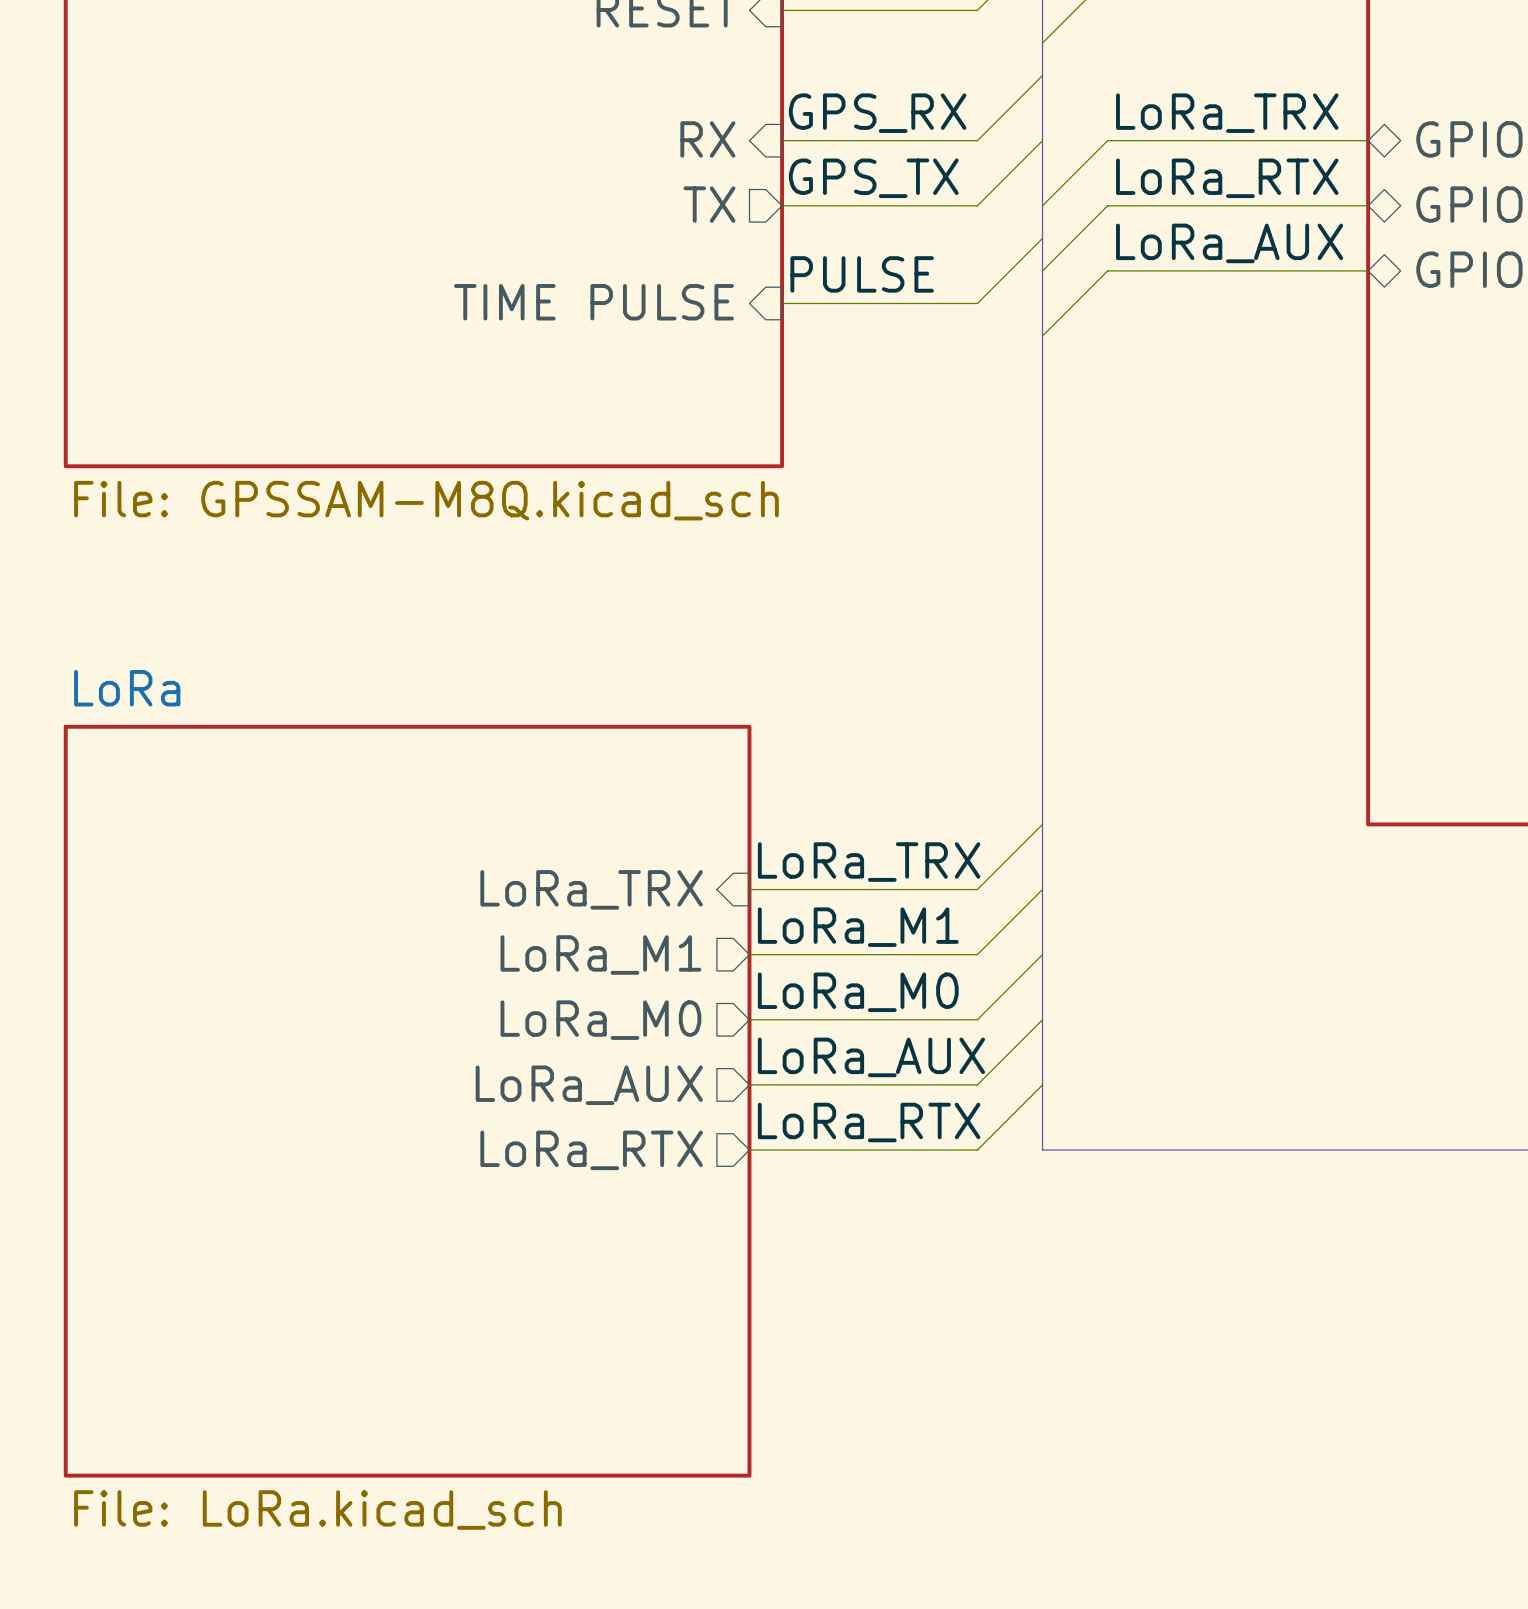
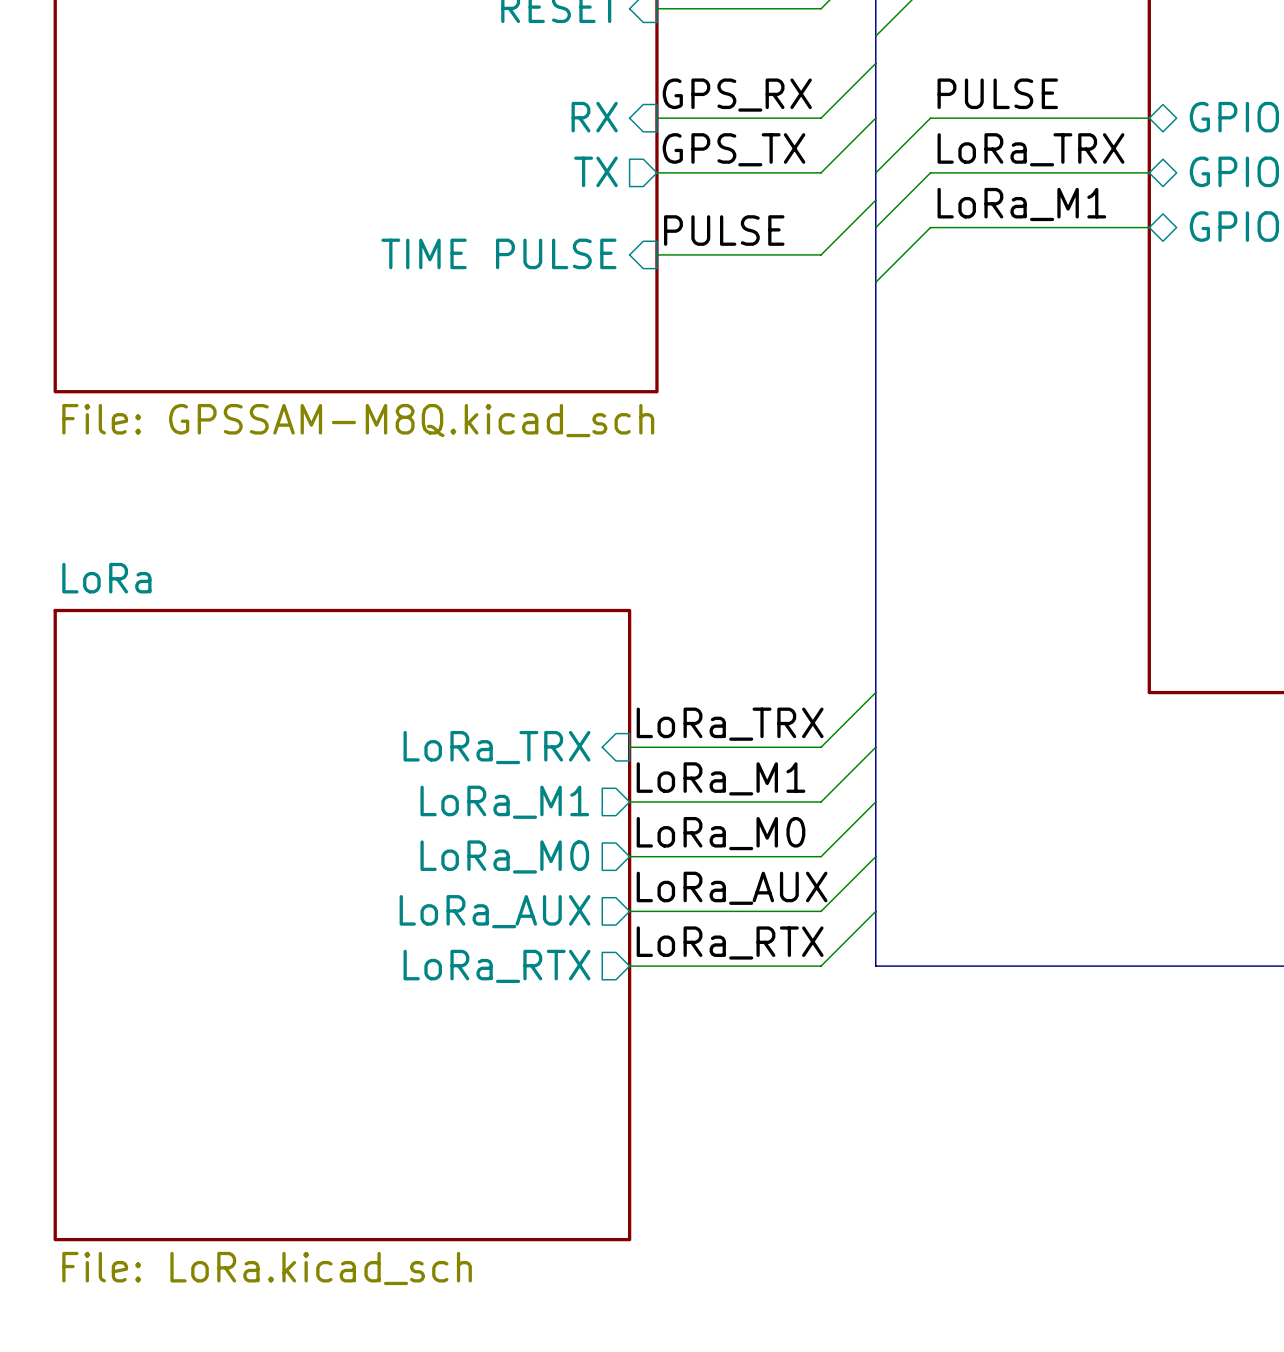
label: LoRa_TRX (1227, 113) -> PULSE (997, 93)
label: LoRa_RTX (1227, 178) -> LoRa_TRX (1030, 149)
label: LoRa_AUX (1229, 243) -> LoRa_M1 (1021, 204)

